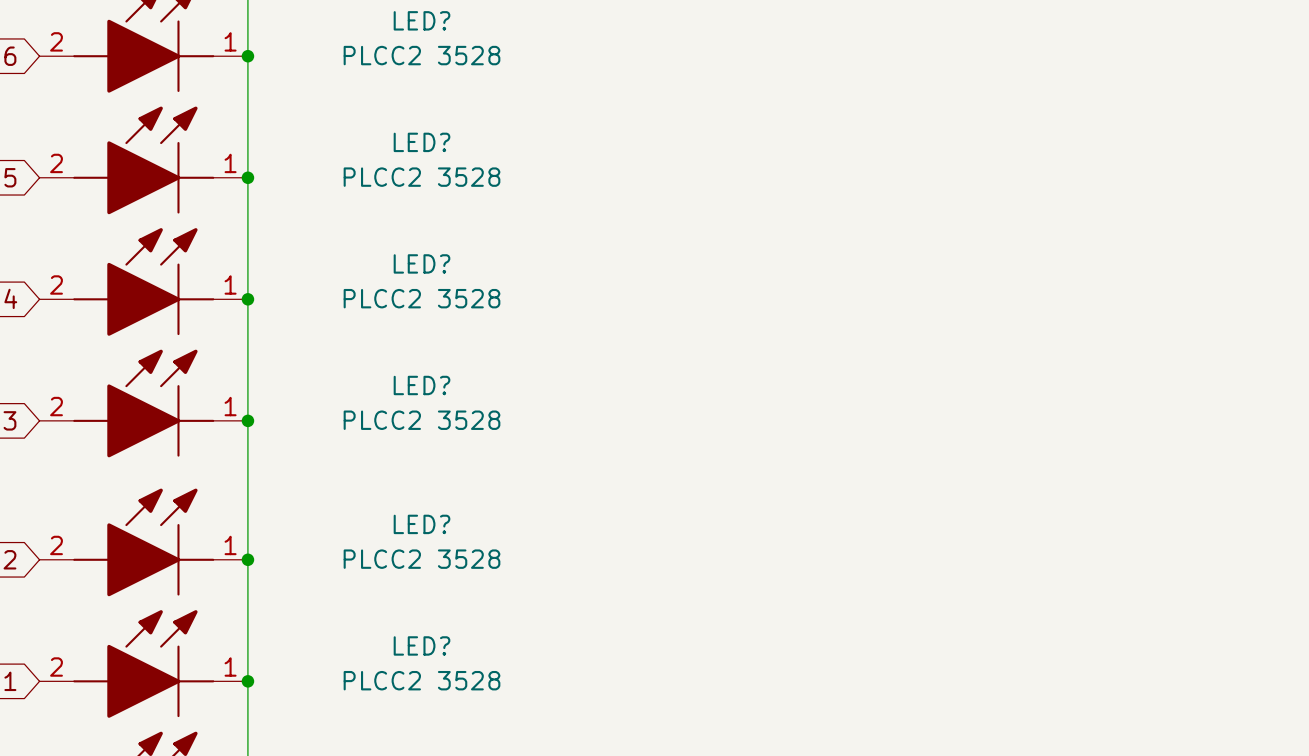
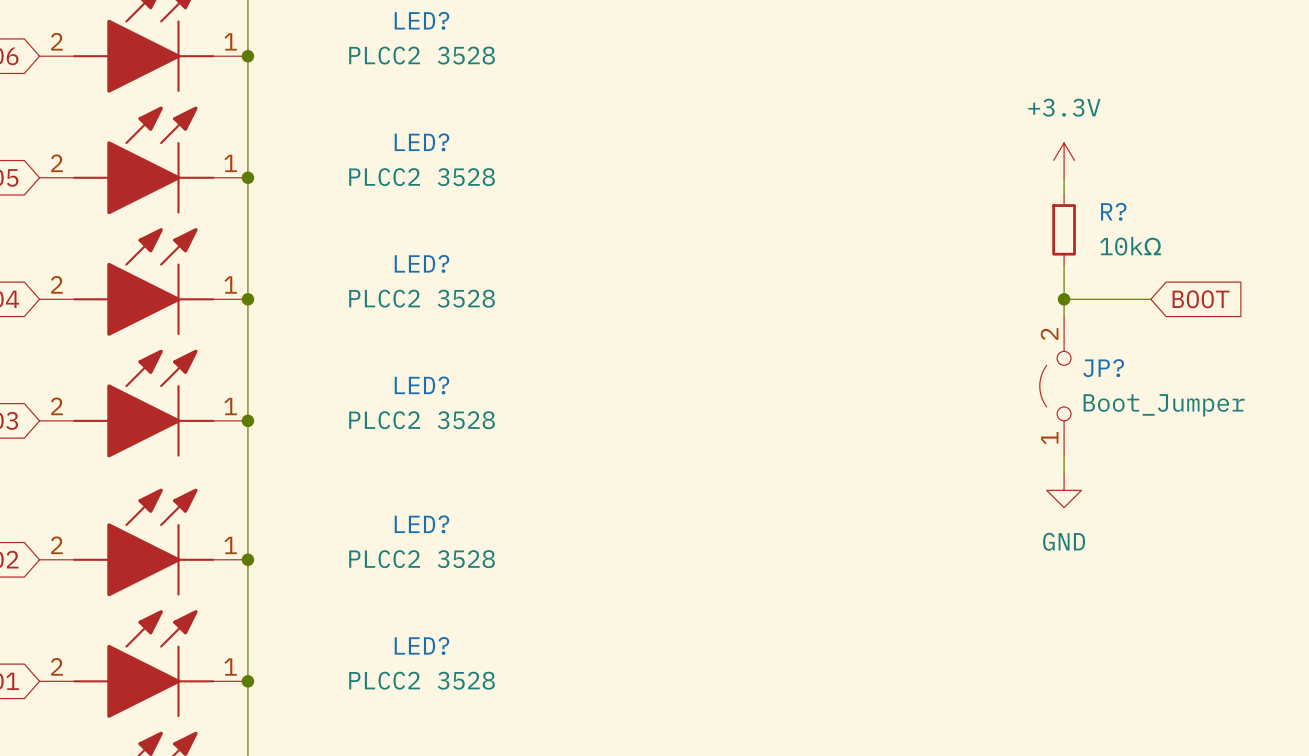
power symbol: none -> +3.3V (1064, 160)
wire: none -> (1064, 177) (1064, 195)
R?: none -> 10kΩ (1064, 229)
wire: none -> (1064, 264) (1064, 316)
wire: none -> (1064, 299) (1150, 299)
junction: none -> (1064, 299)
global label: none -> BOOT (1201, 299)
JP?: none -> Boot_Jumper (1055, 386)
wire: none -> (1064, 455) (1064, 472)
power symbol: none -> GND (1064, 490)

